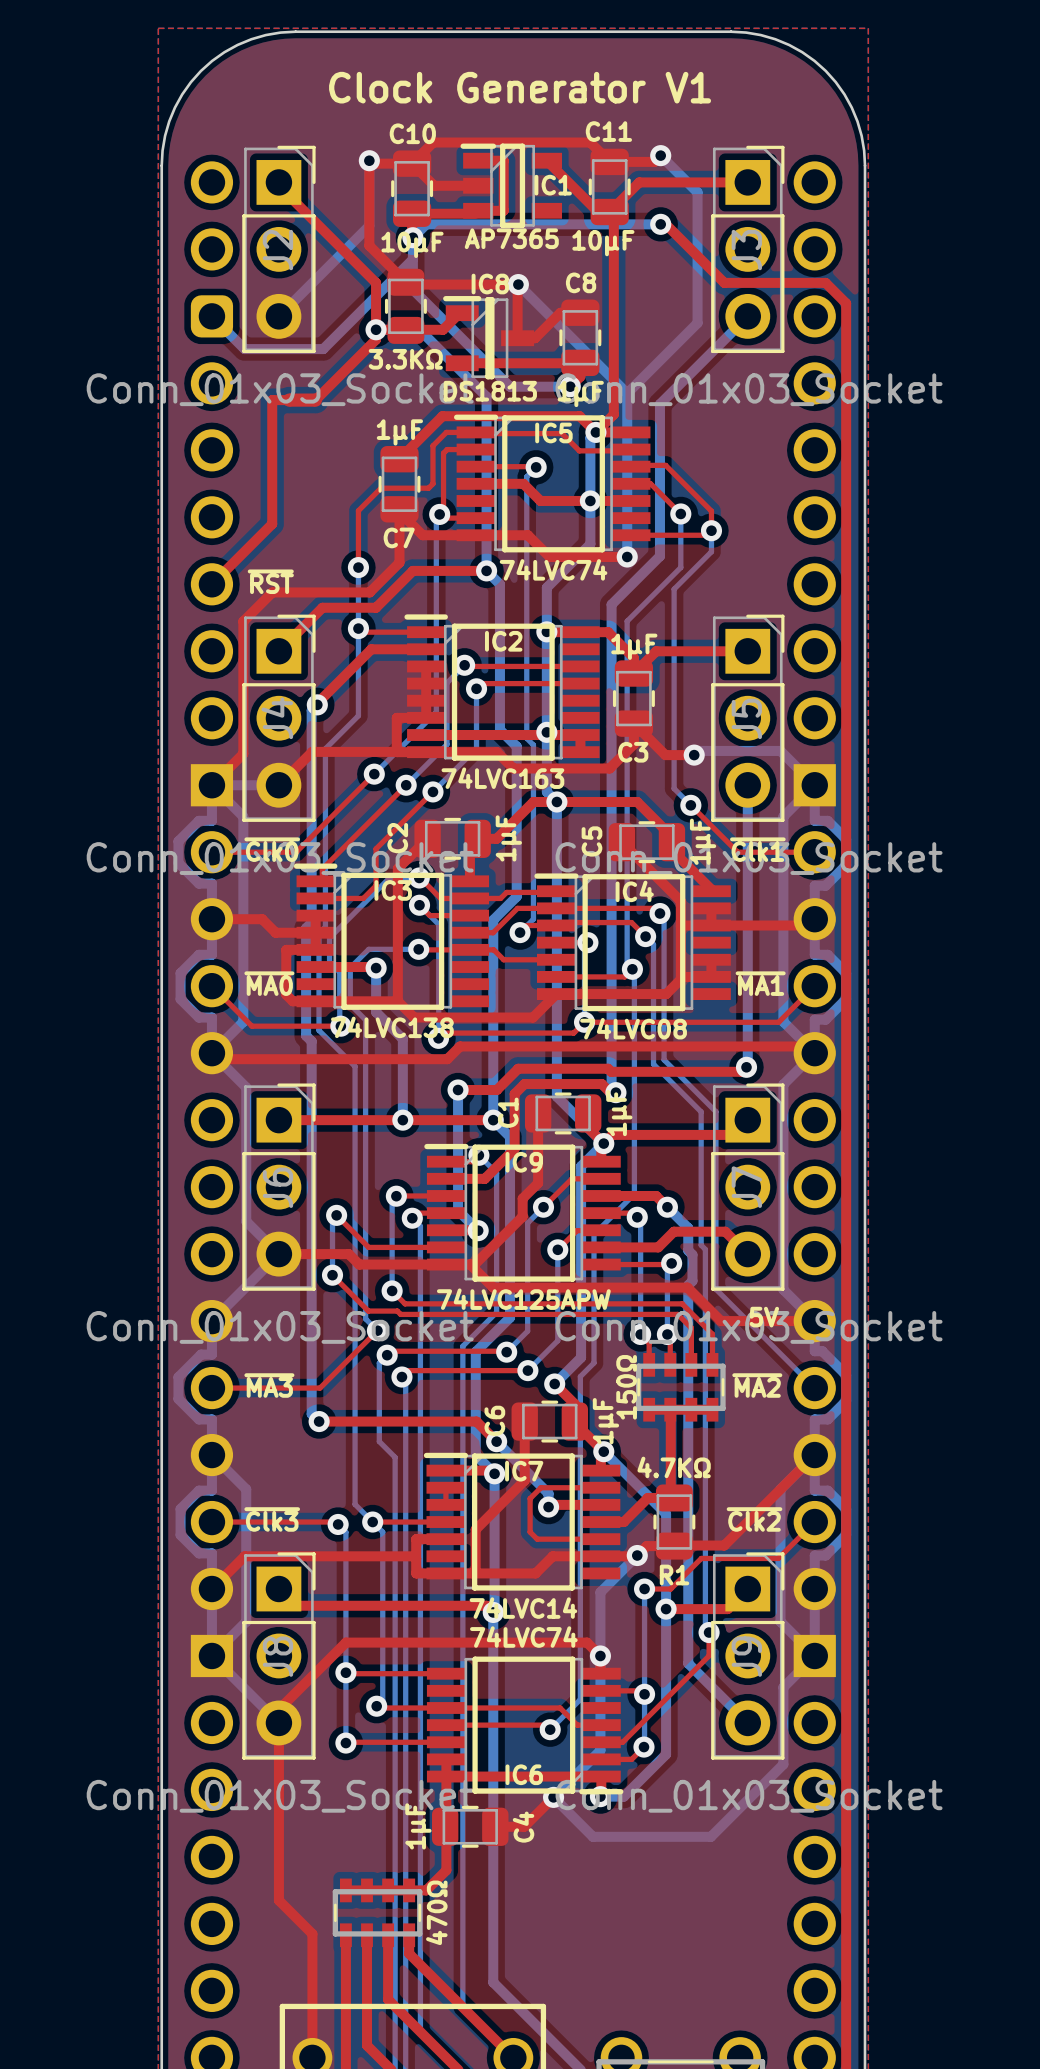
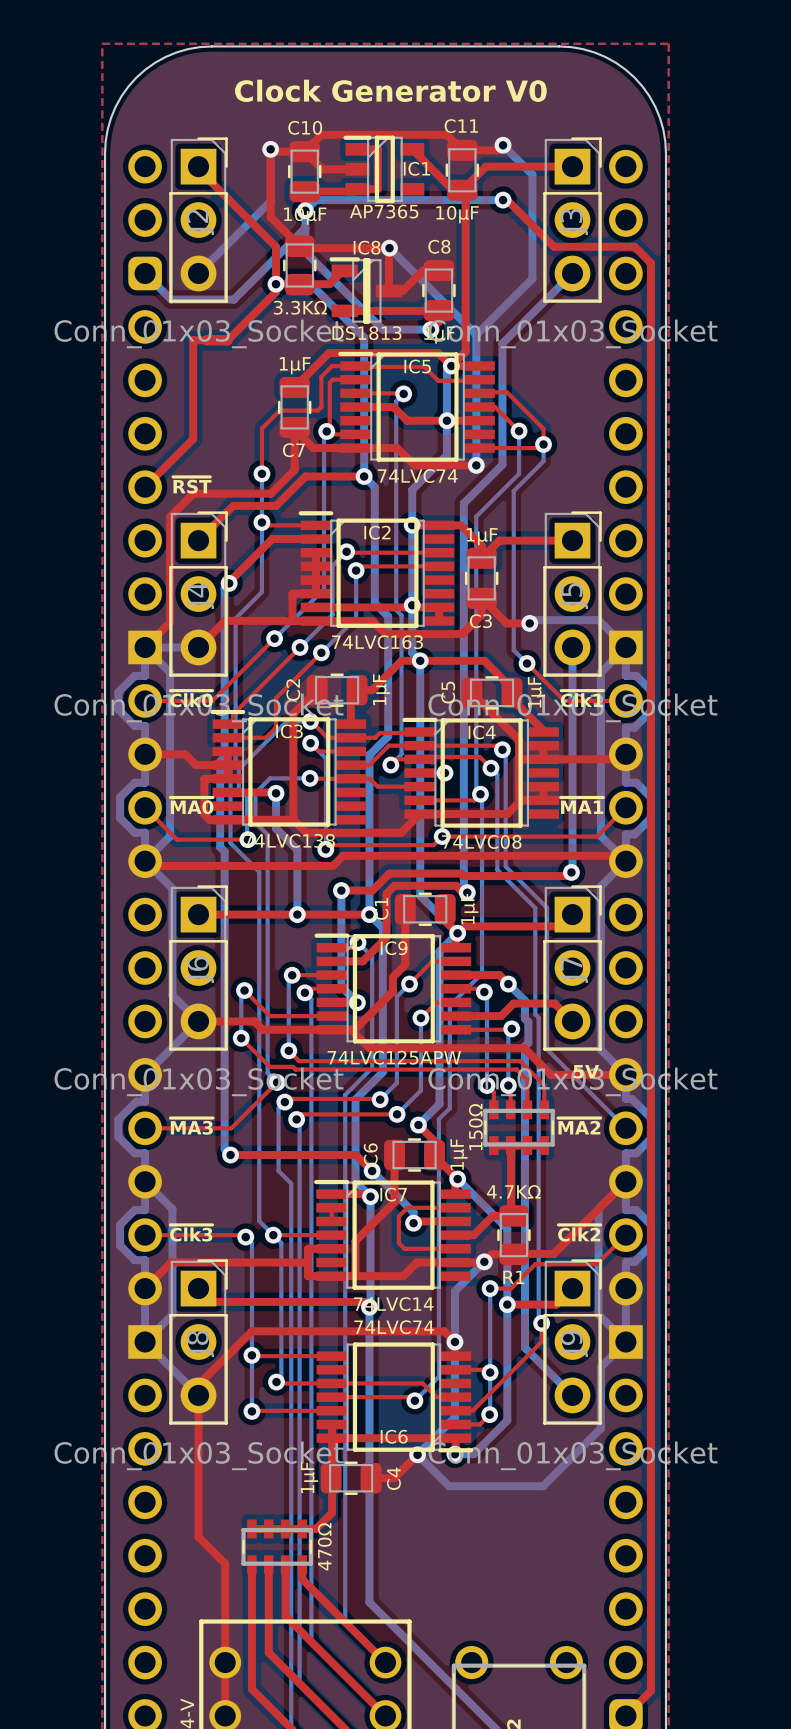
text: Clock Generator V1 (520, 87) -> Clock Generator V0 (390, 90)

